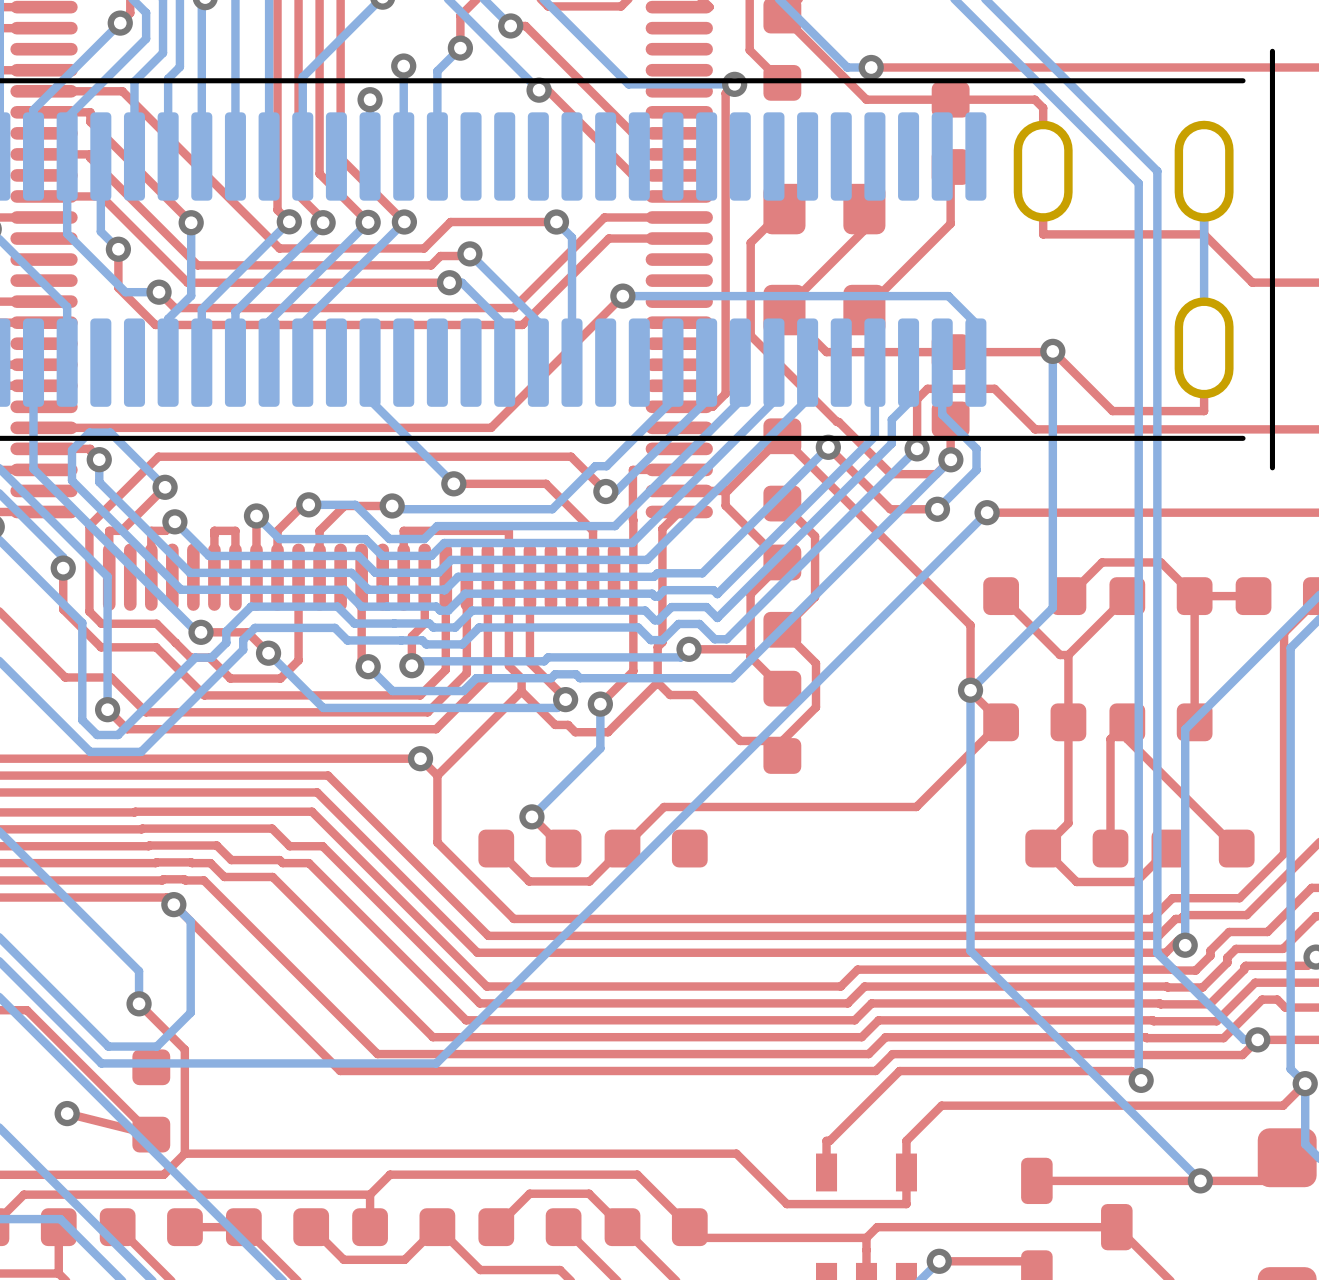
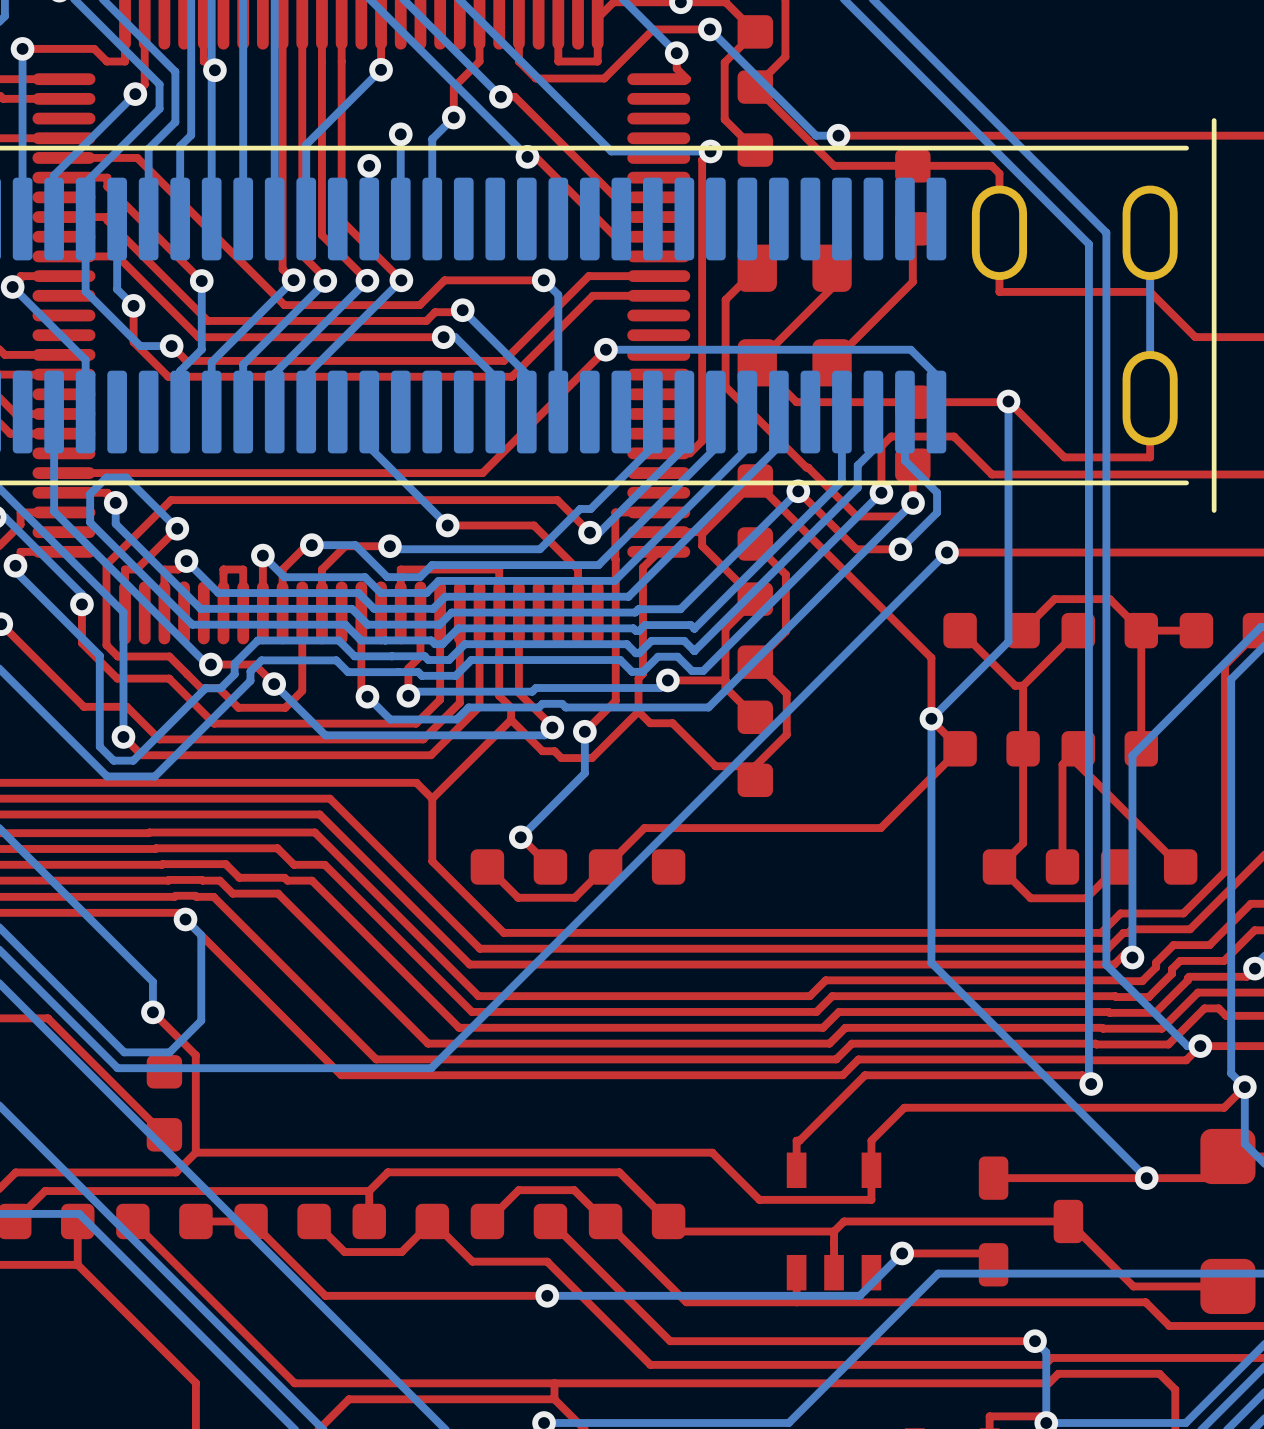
via: (420, 758) -> none
top track: (67, 1113) (151, 1134) -> none
via: (67, 1113) -> none

